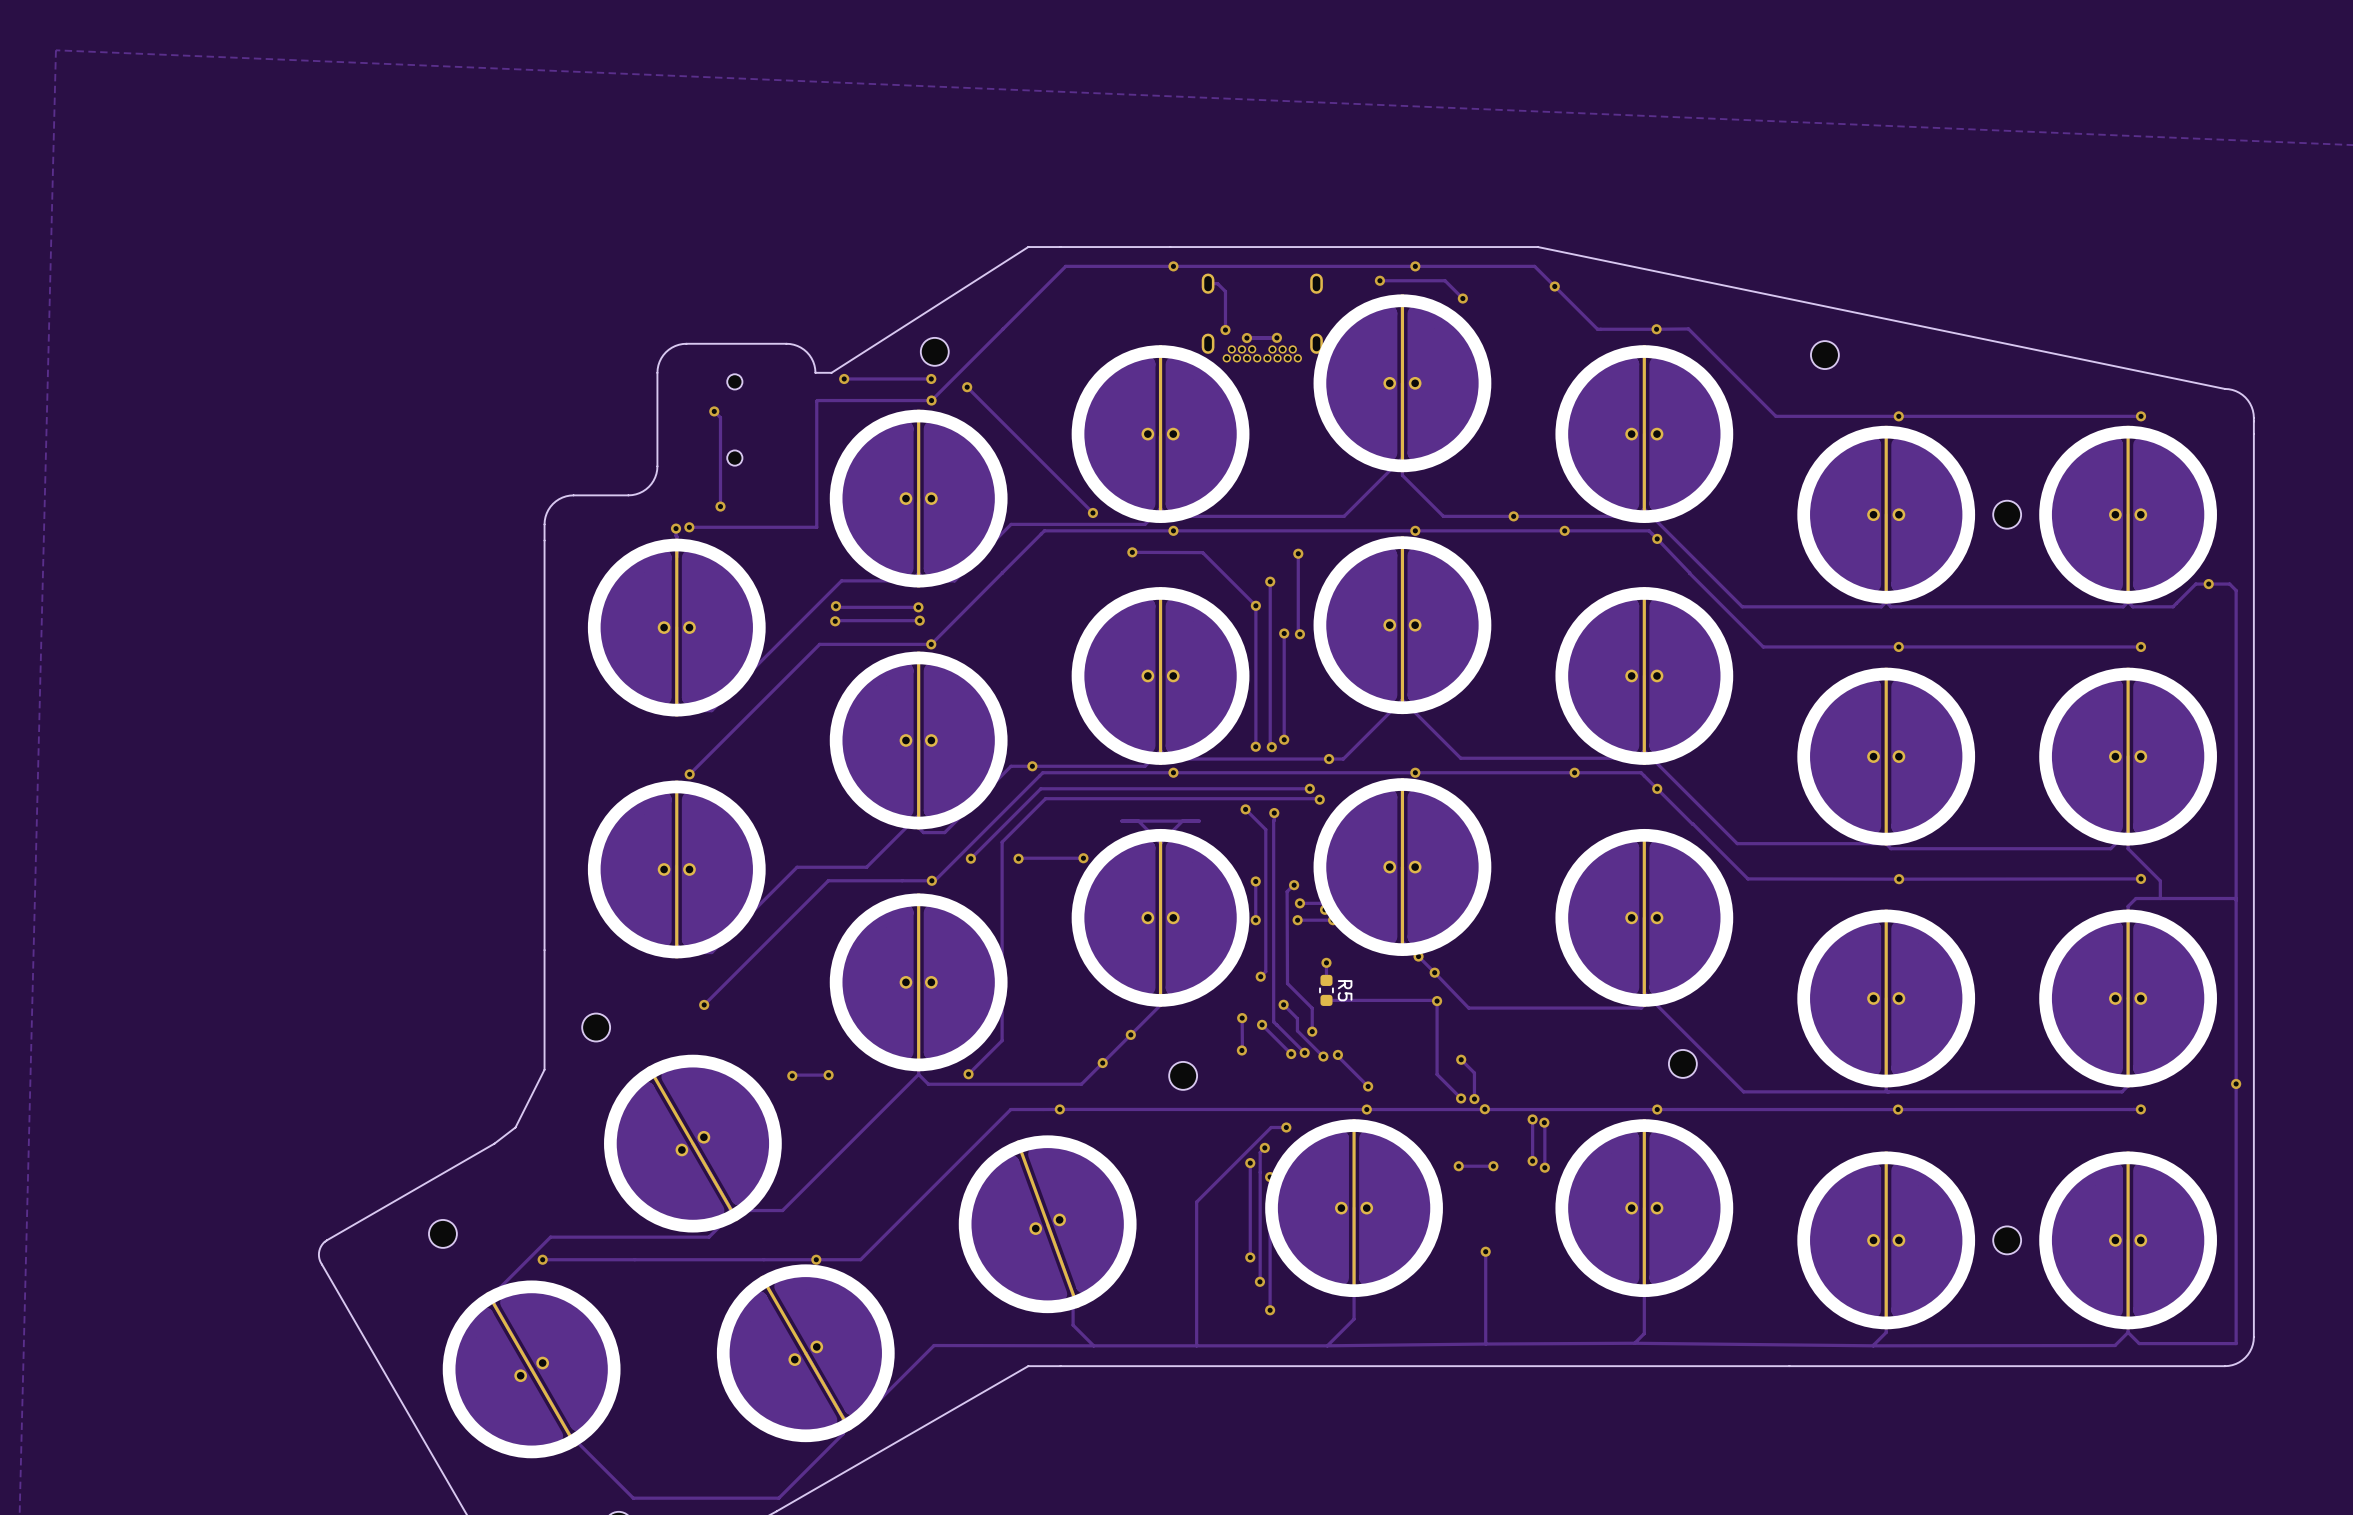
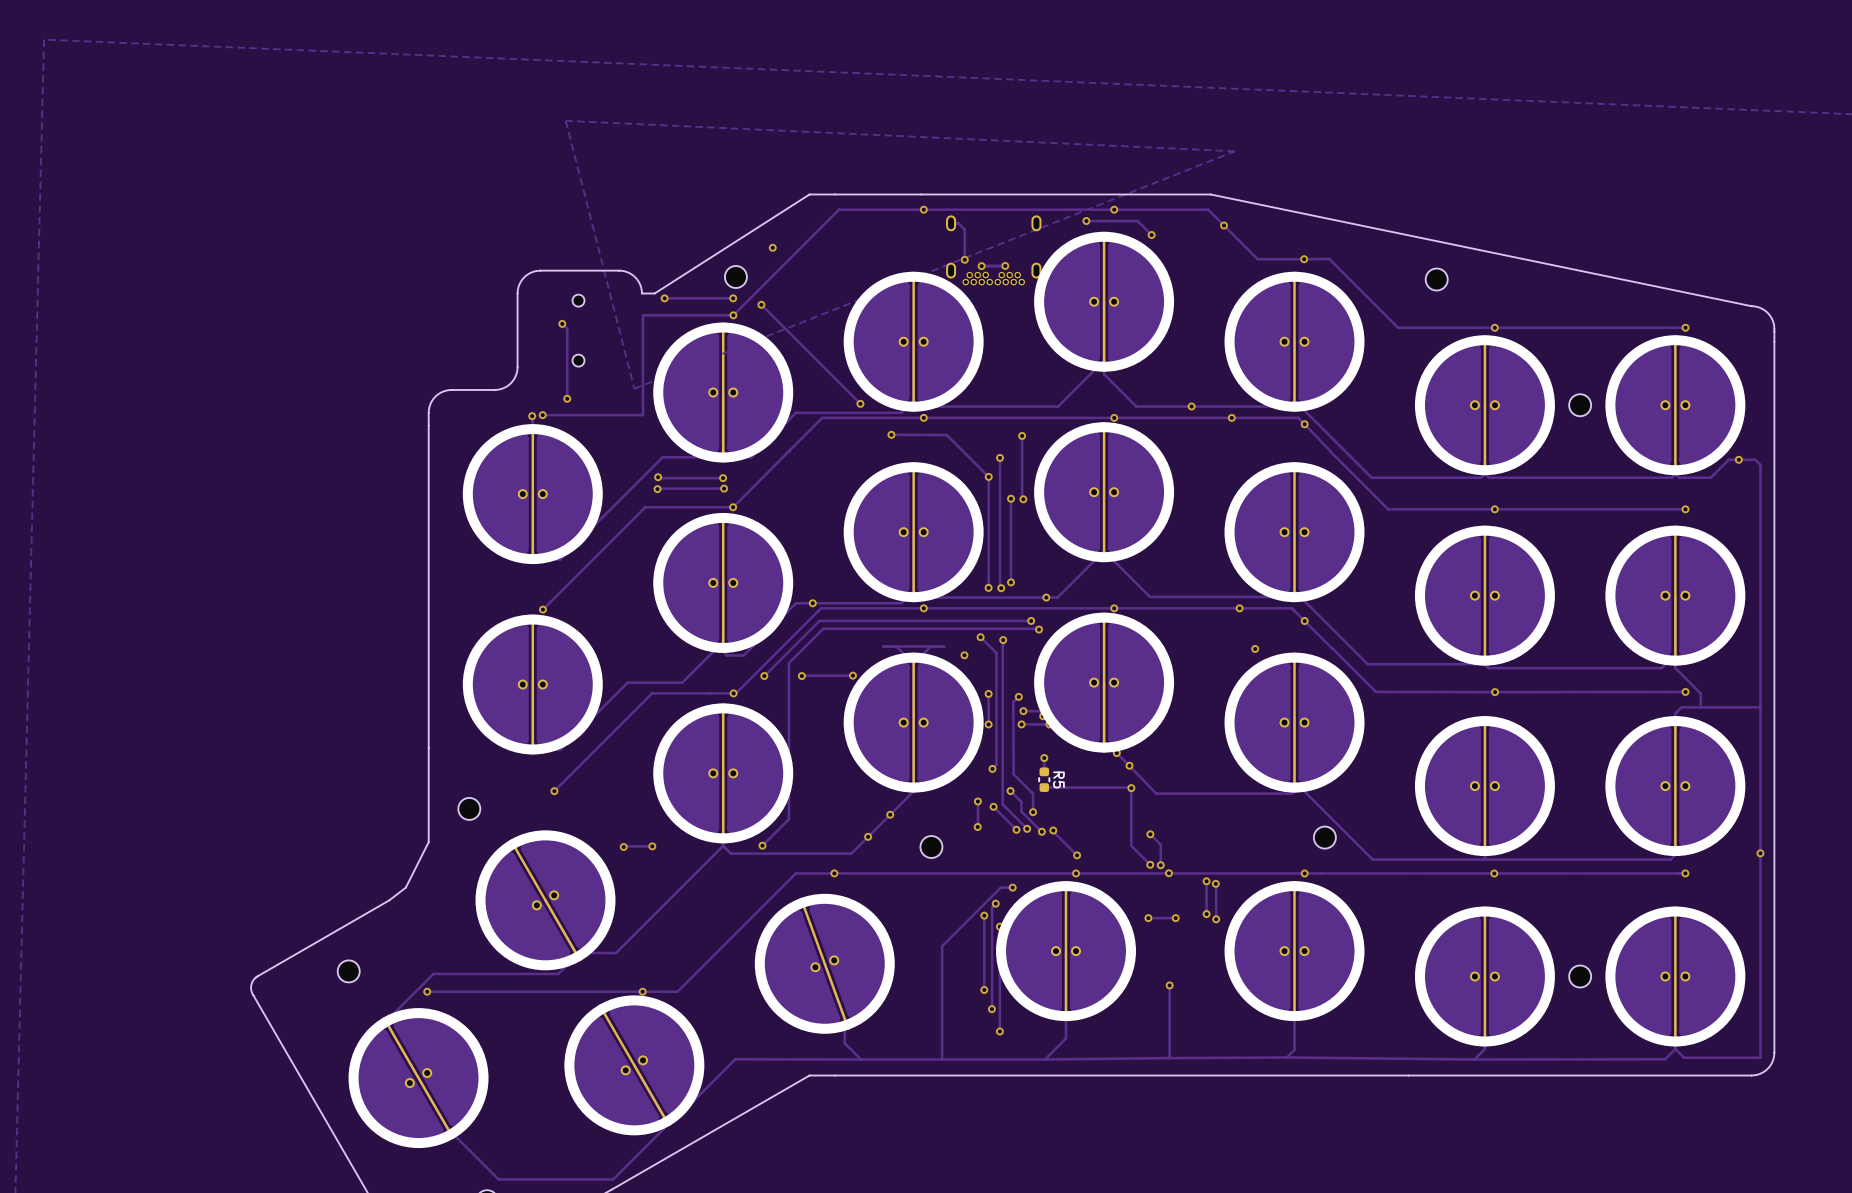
zone outline: none -> (565, 120) (1234, 151) (634, 388) (565, 120)
via: none -> (772, 247)
via: none -> (1255, 648)
via: none -> (964, 655)

